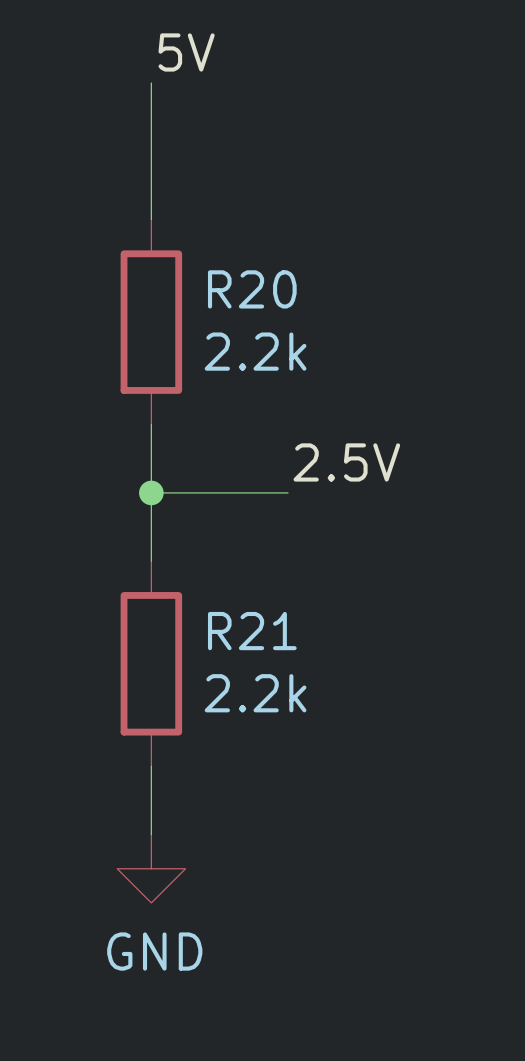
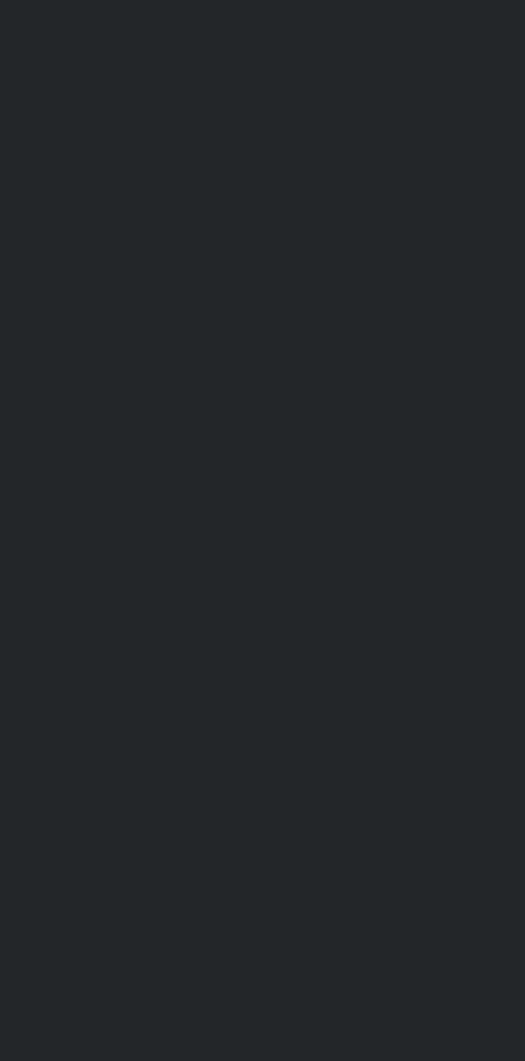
label: 5V (186, 52) -> none
wire: (151, 82) (151, 219) -> none
R20: 2.2k (151, 322) -> none
wire: (151, 424) (151, 561) -> none
label: 2.5V (346, 462) -> none
wire: (151, 492) (288, 492) -> none
junction: (151, 492) -> none
R21: 2.2k (151, 663) -> none
wire: (151, 766) (151, 834) -> none
power symbol: GND (151, 868) -> none

